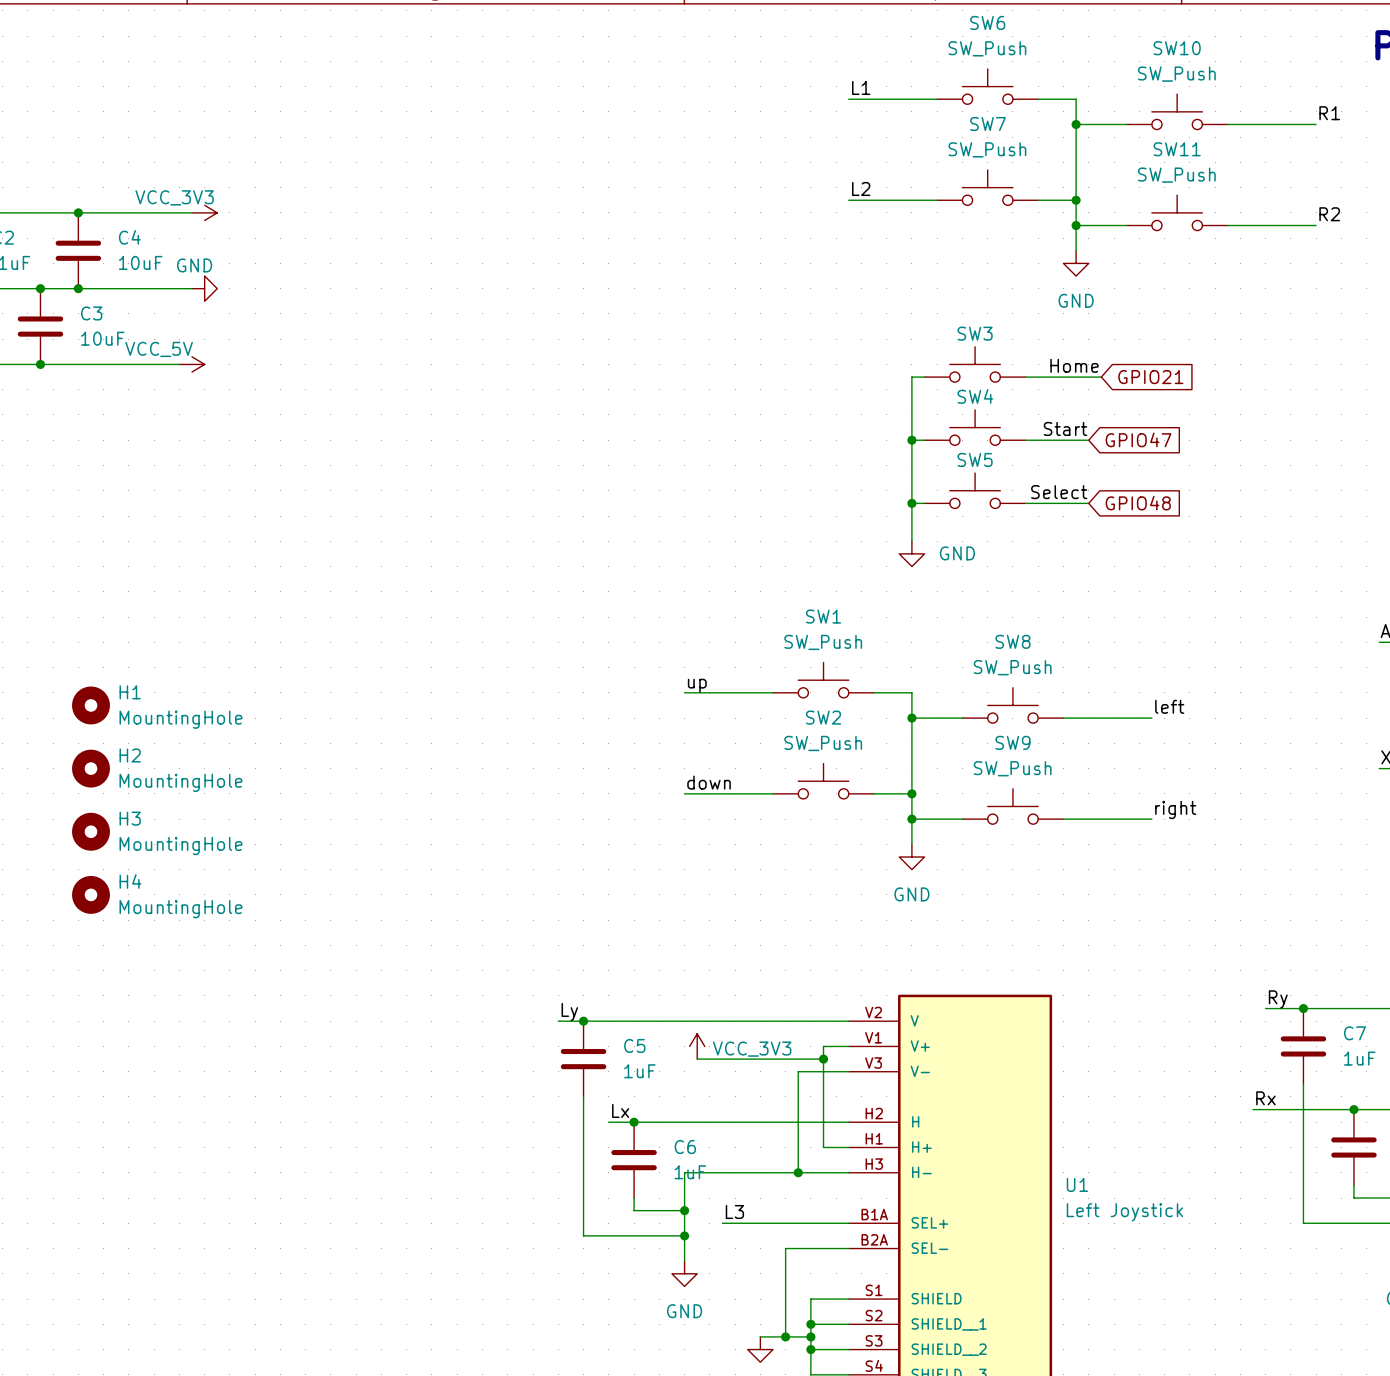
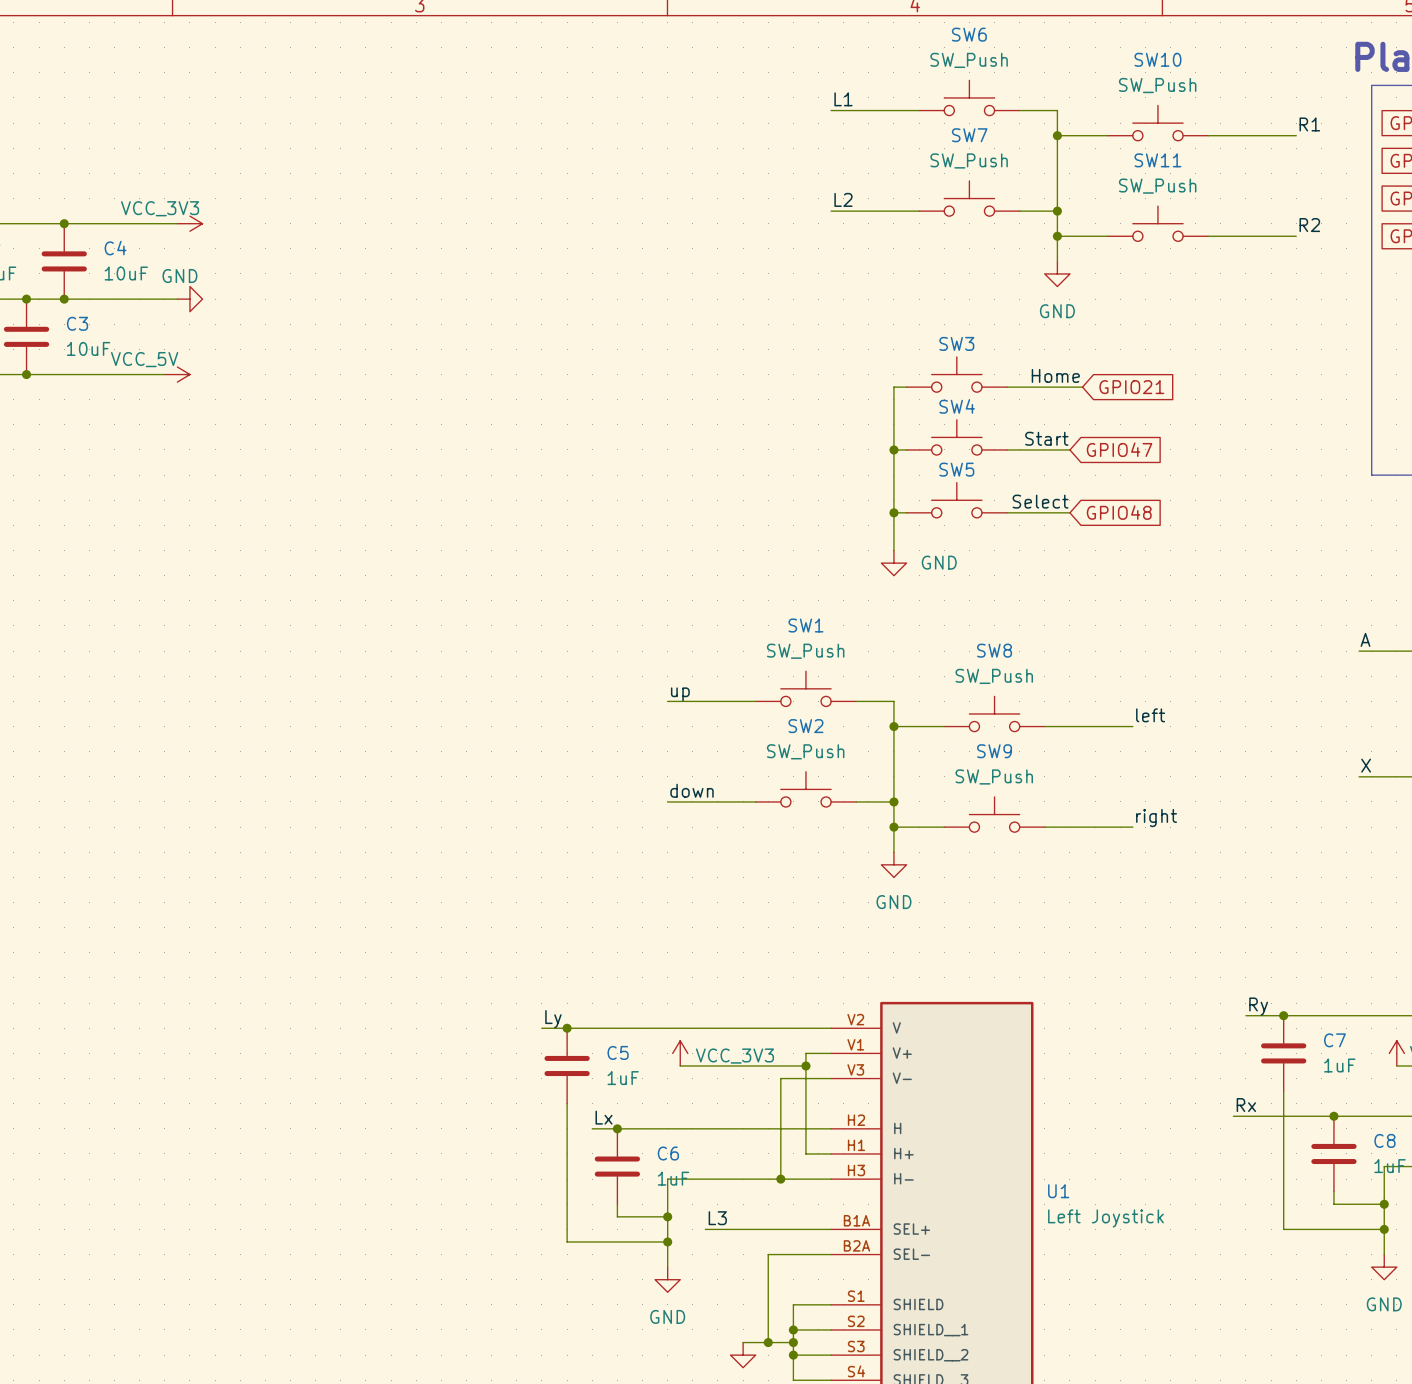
H1: MountingHole (90, 705) -> none
H2: MountingHole (90, 768) -> none
H3: MountingHole (90, 831) -> none
H4: MountingHole (90, 894) -> none

